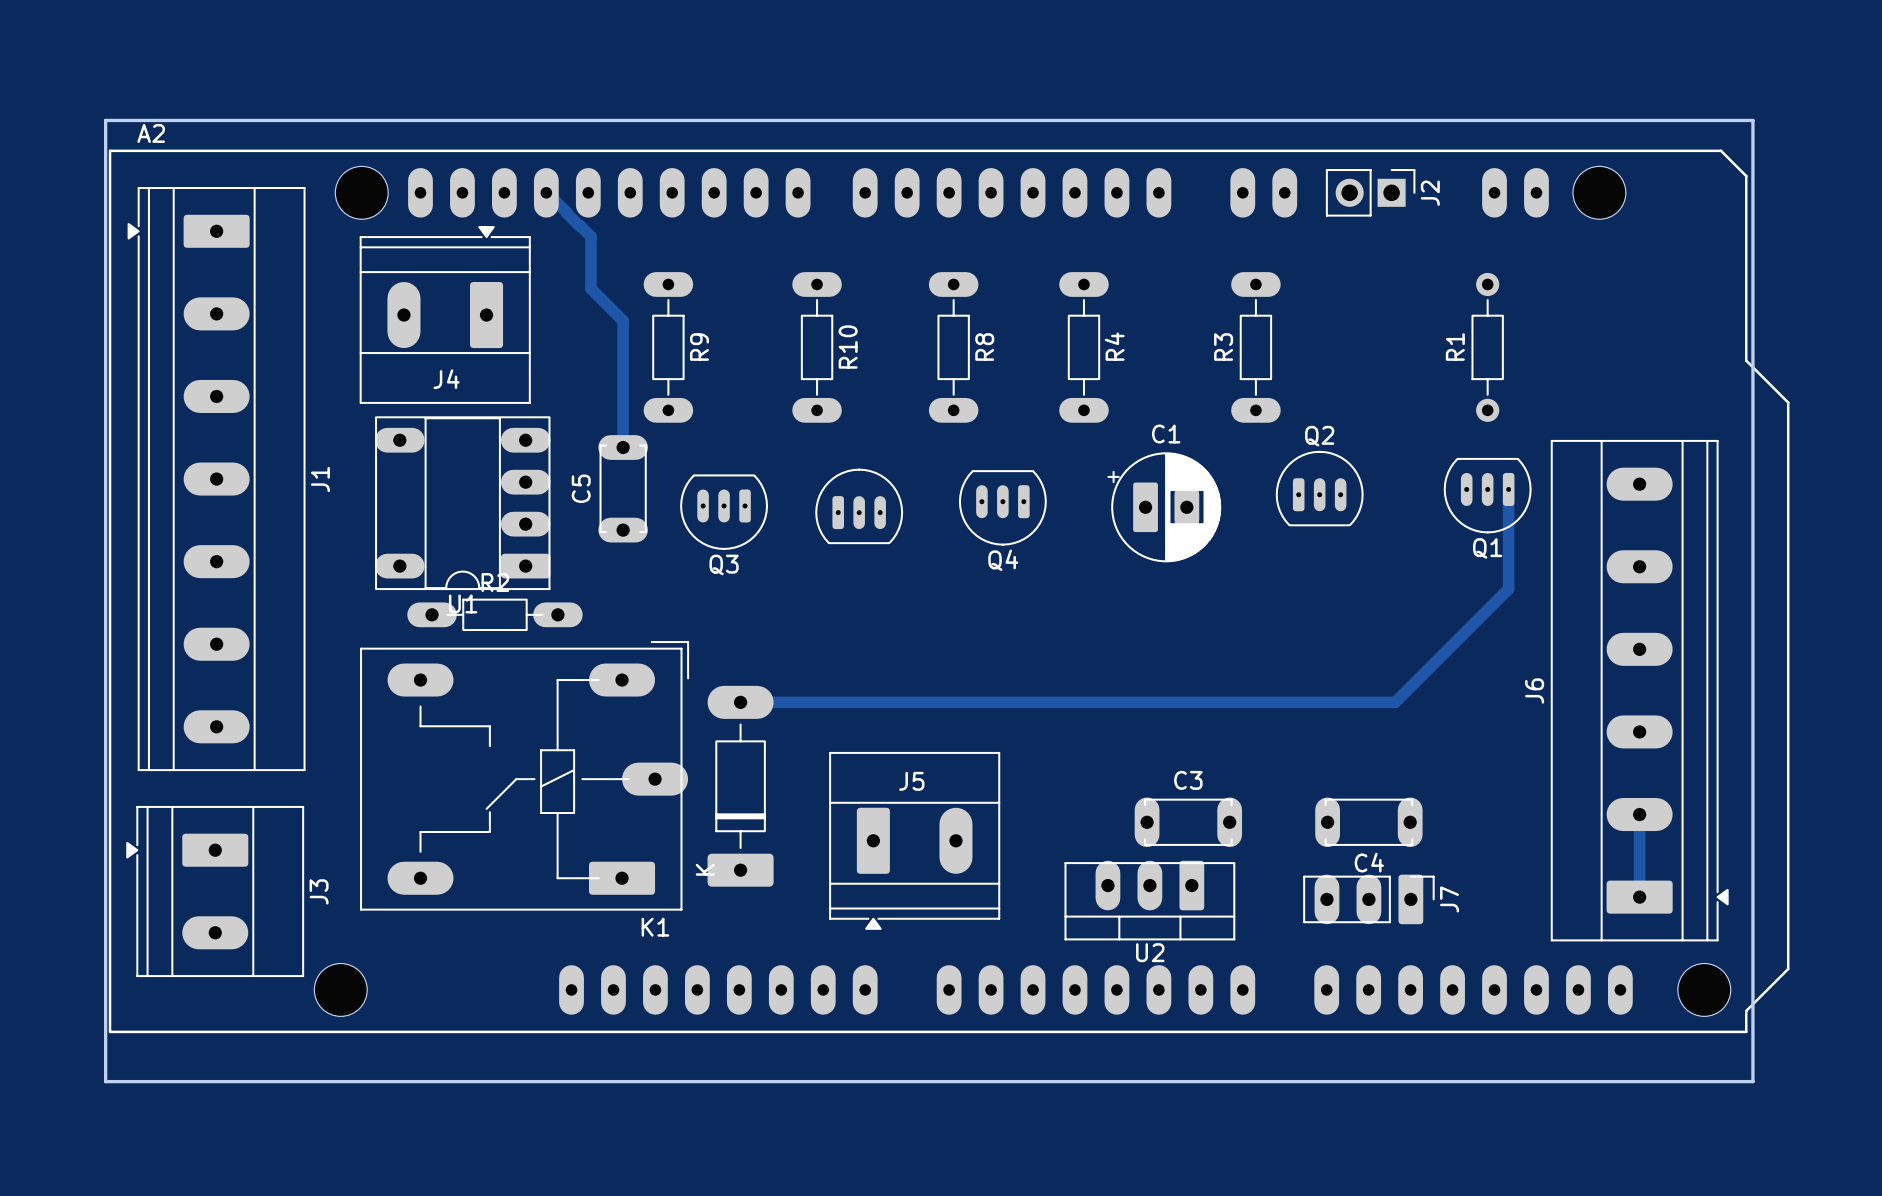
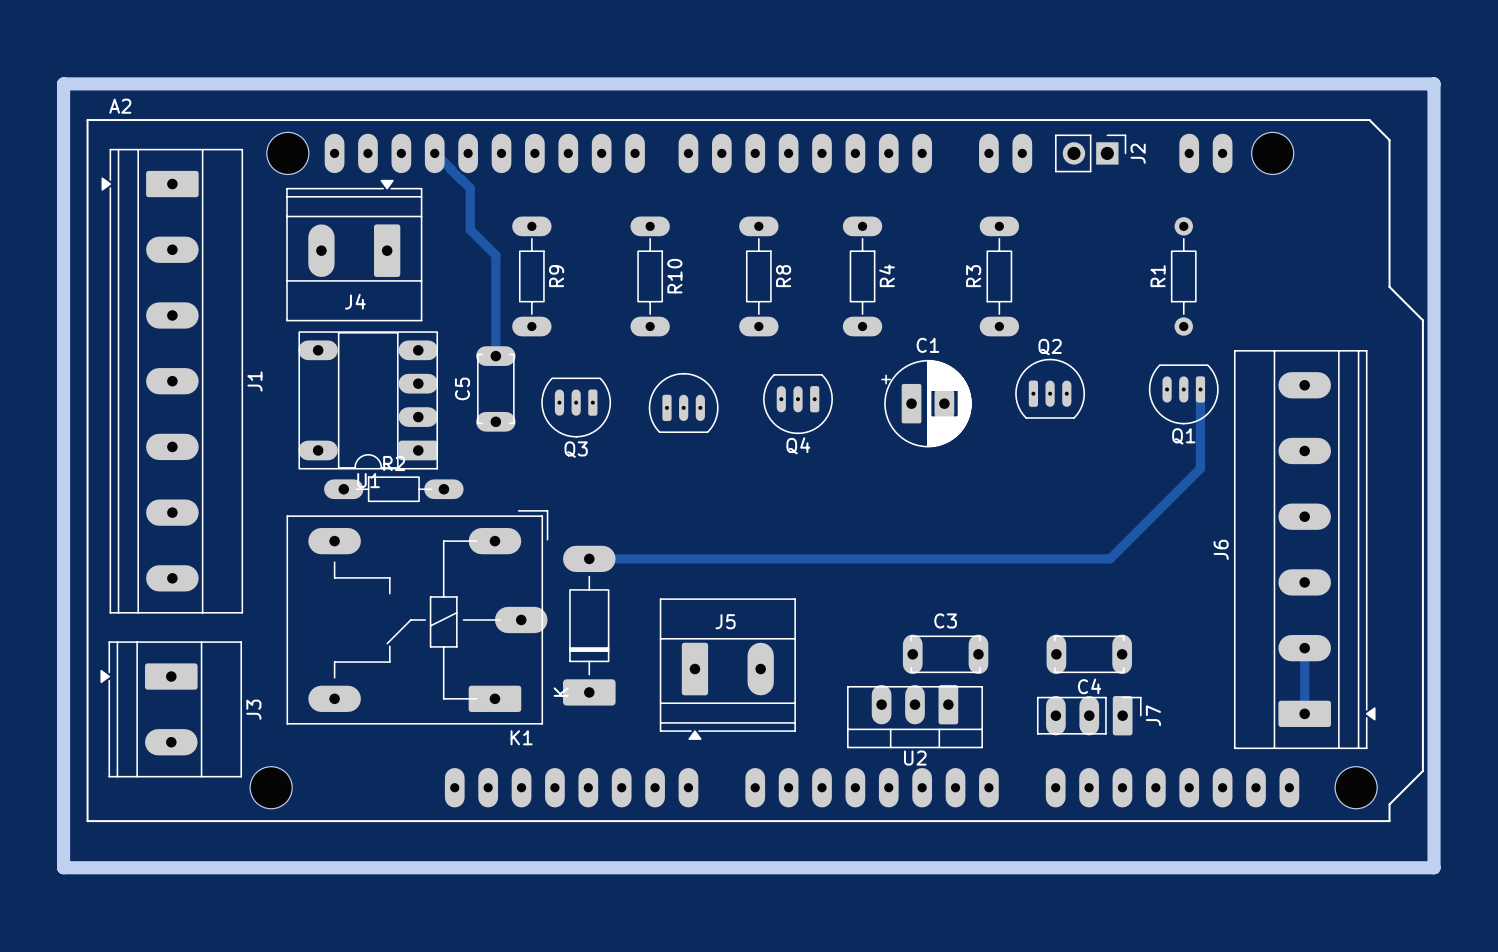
board edge: (105, 120) (1752, 120) (1752, 1081) (105, 1081) (105, 120) -> (63, 83) (63, 867) (1434, 867) (1434, 83) (63, 83)

